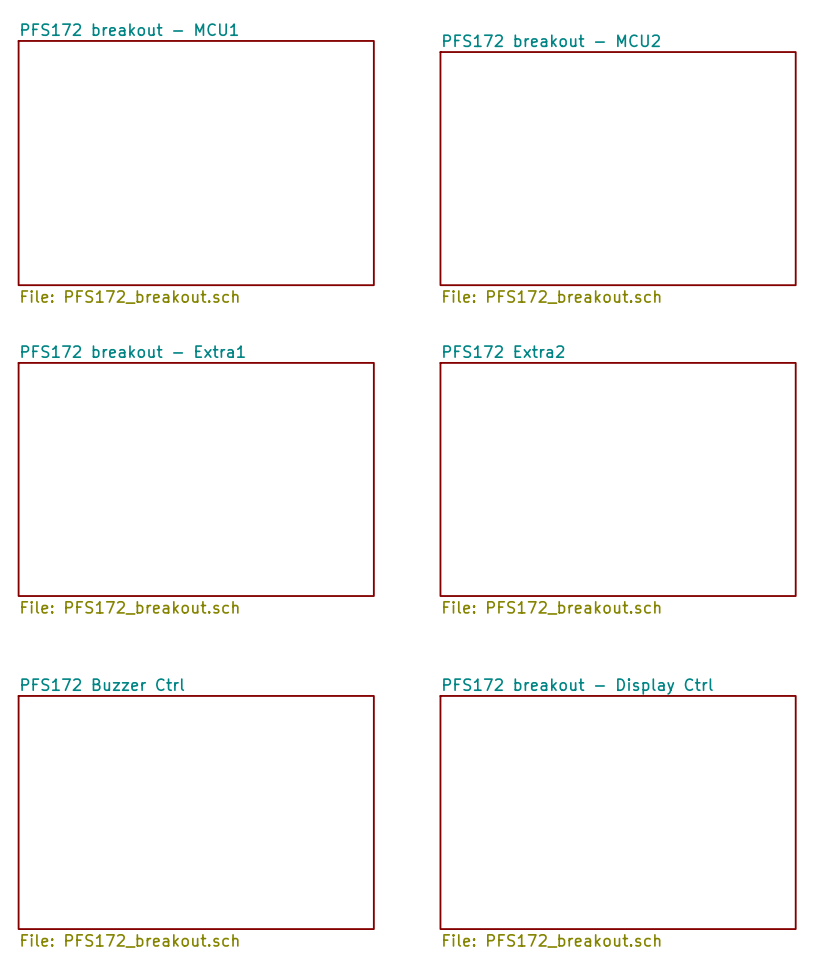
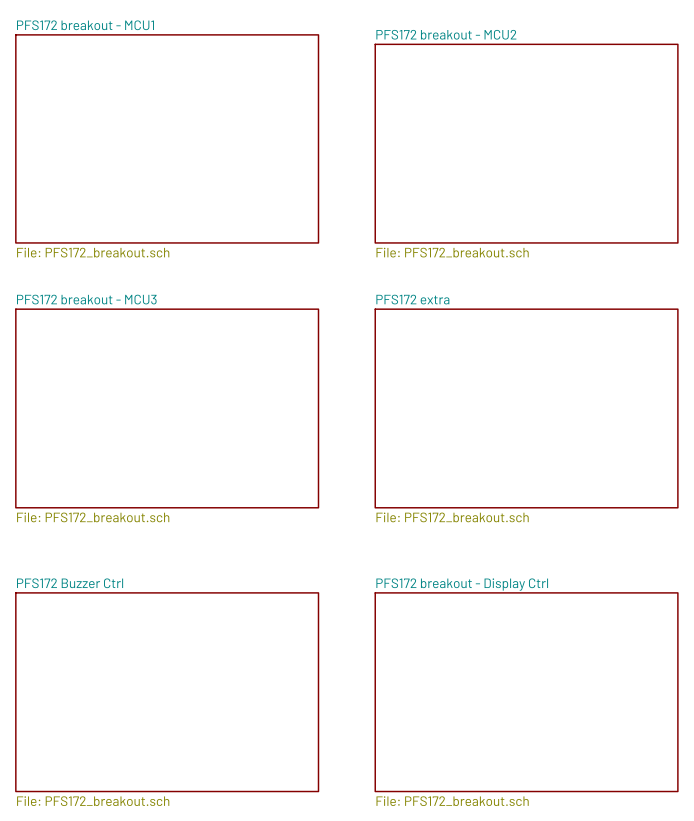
sheet PFS172 breakout - Extra1 name: PFS172 breakout - Extra1 (133, 351) -> PFS172 breakout - MCU3 (86, 299)
sheet PFS172 Extra2 name: PFS172 Extra2 (503, 351) -> PFS172 extra (412, 299)

